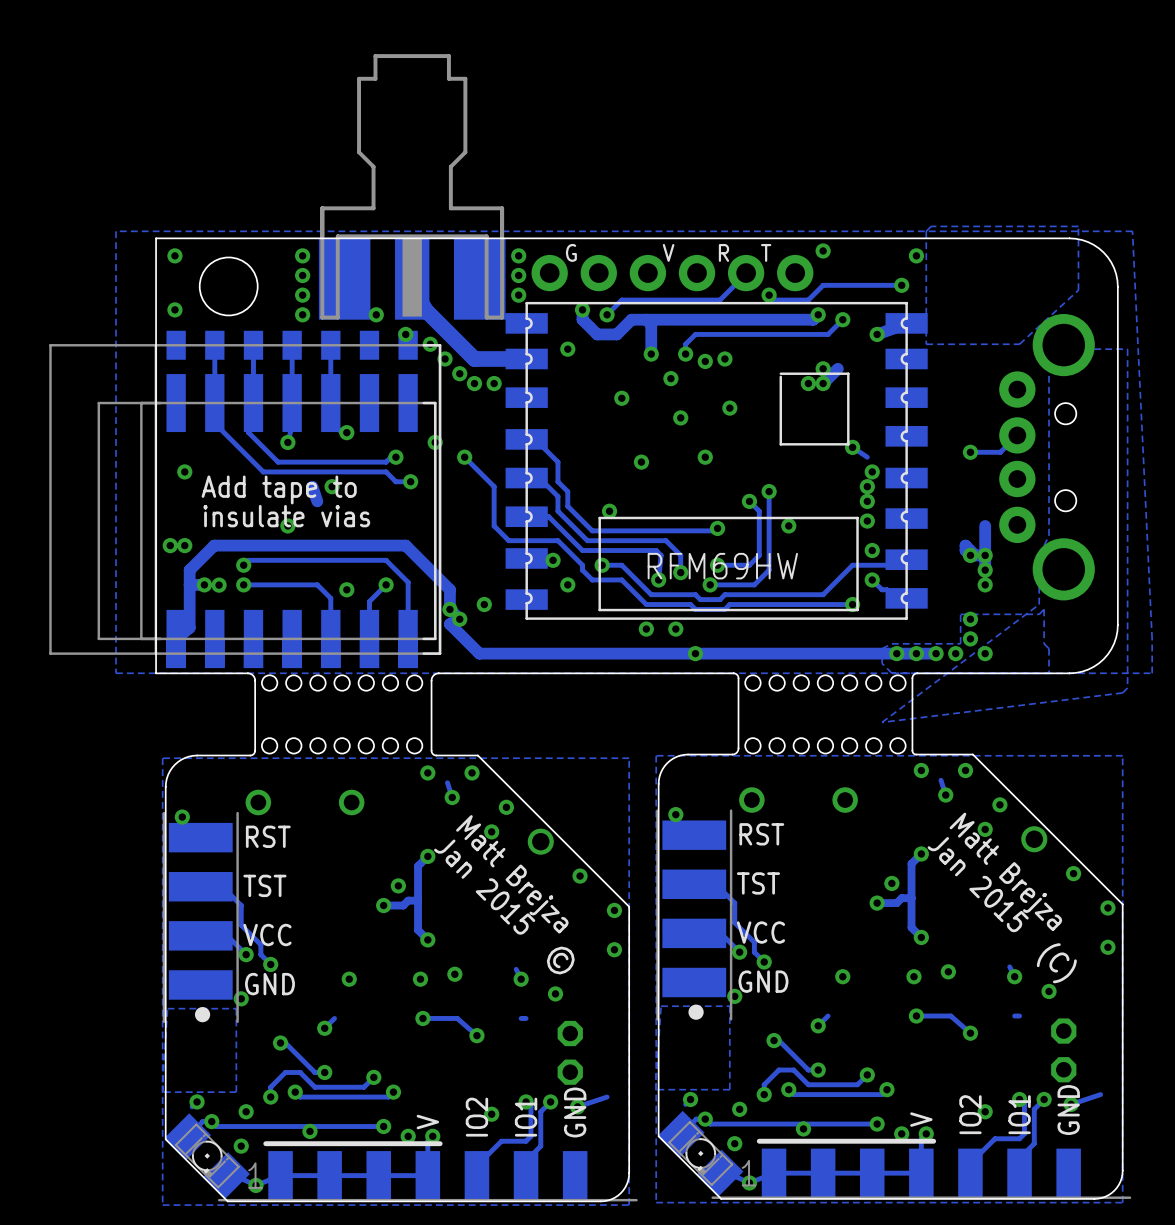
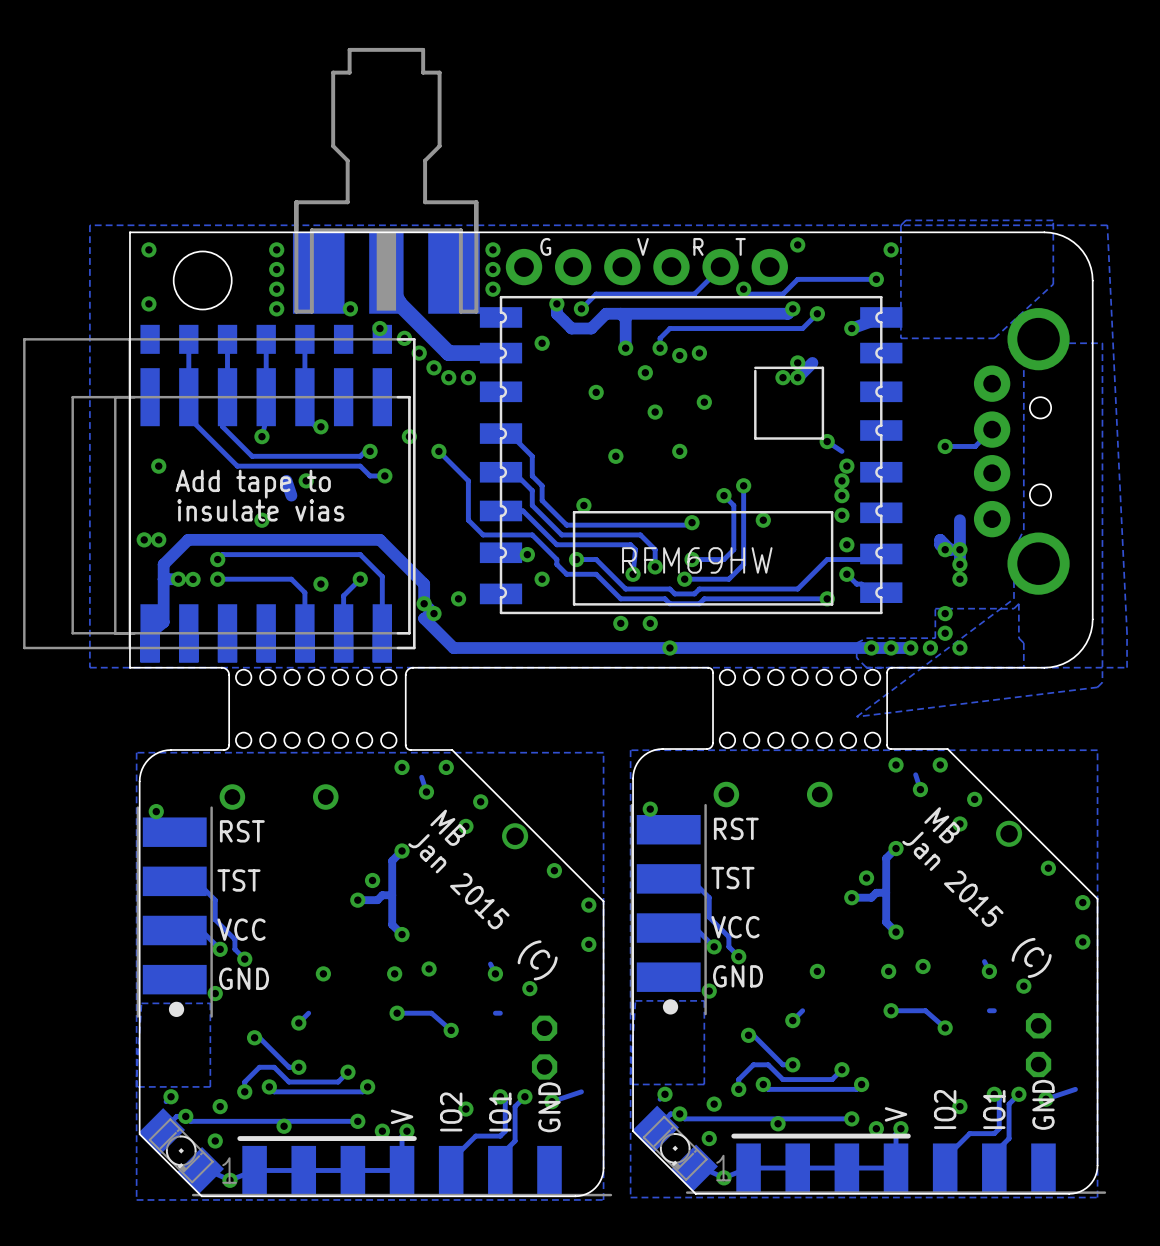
text: Matt Brejza (1005, 871) -> MB (942, 825)
text: Matt Brejza (512, 874) -> MB (448, 827)
text: © (560, 960) -> (C) (537, 960)

